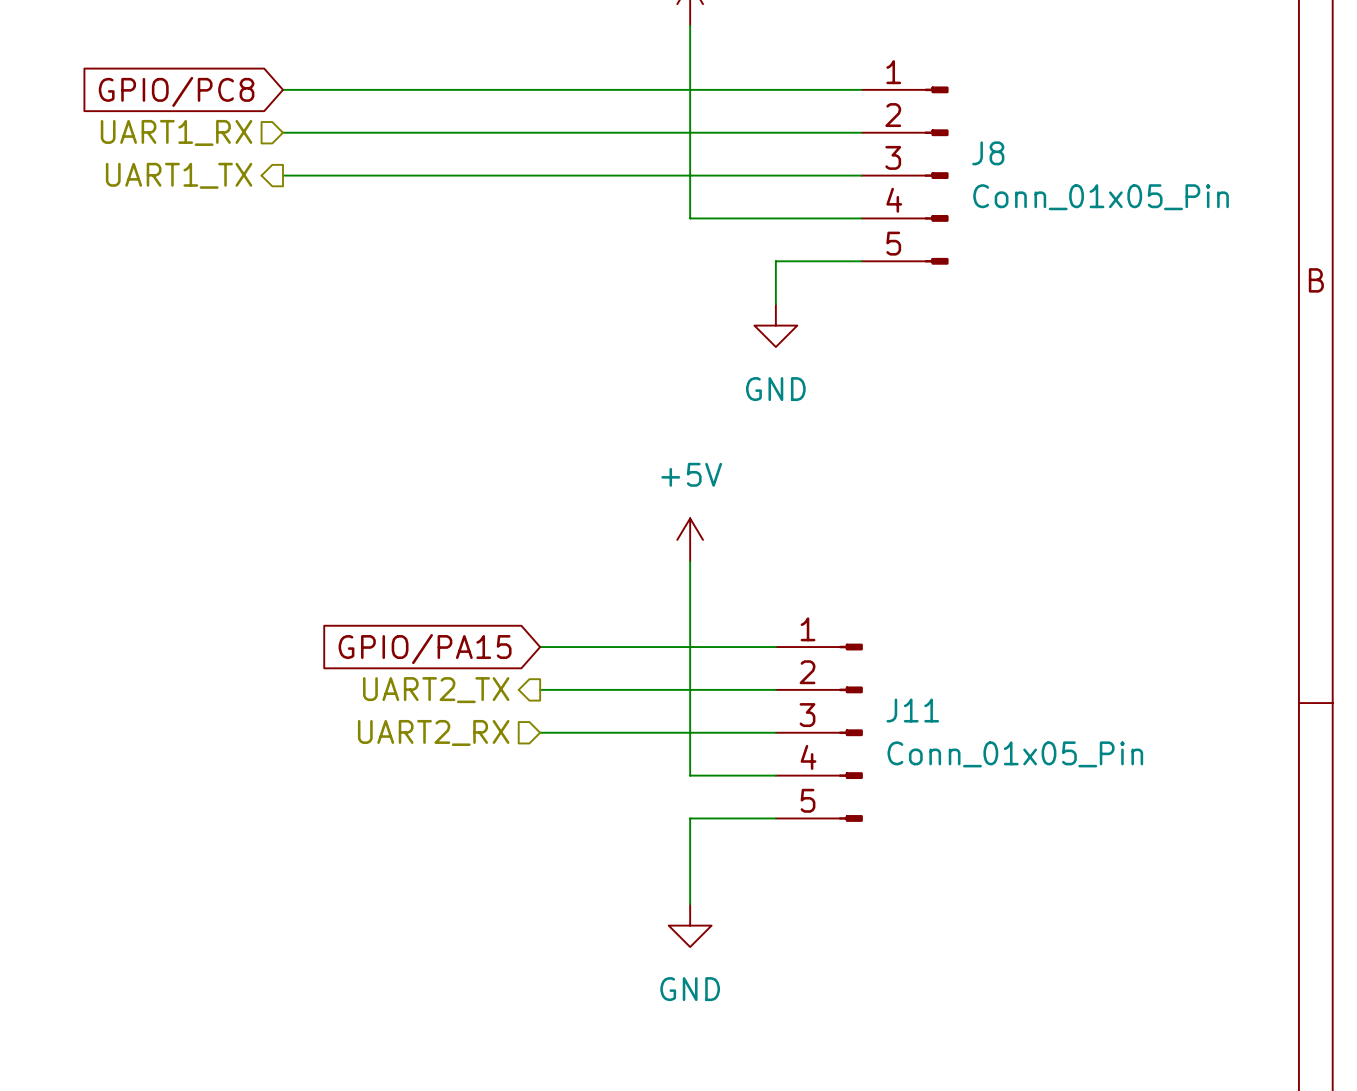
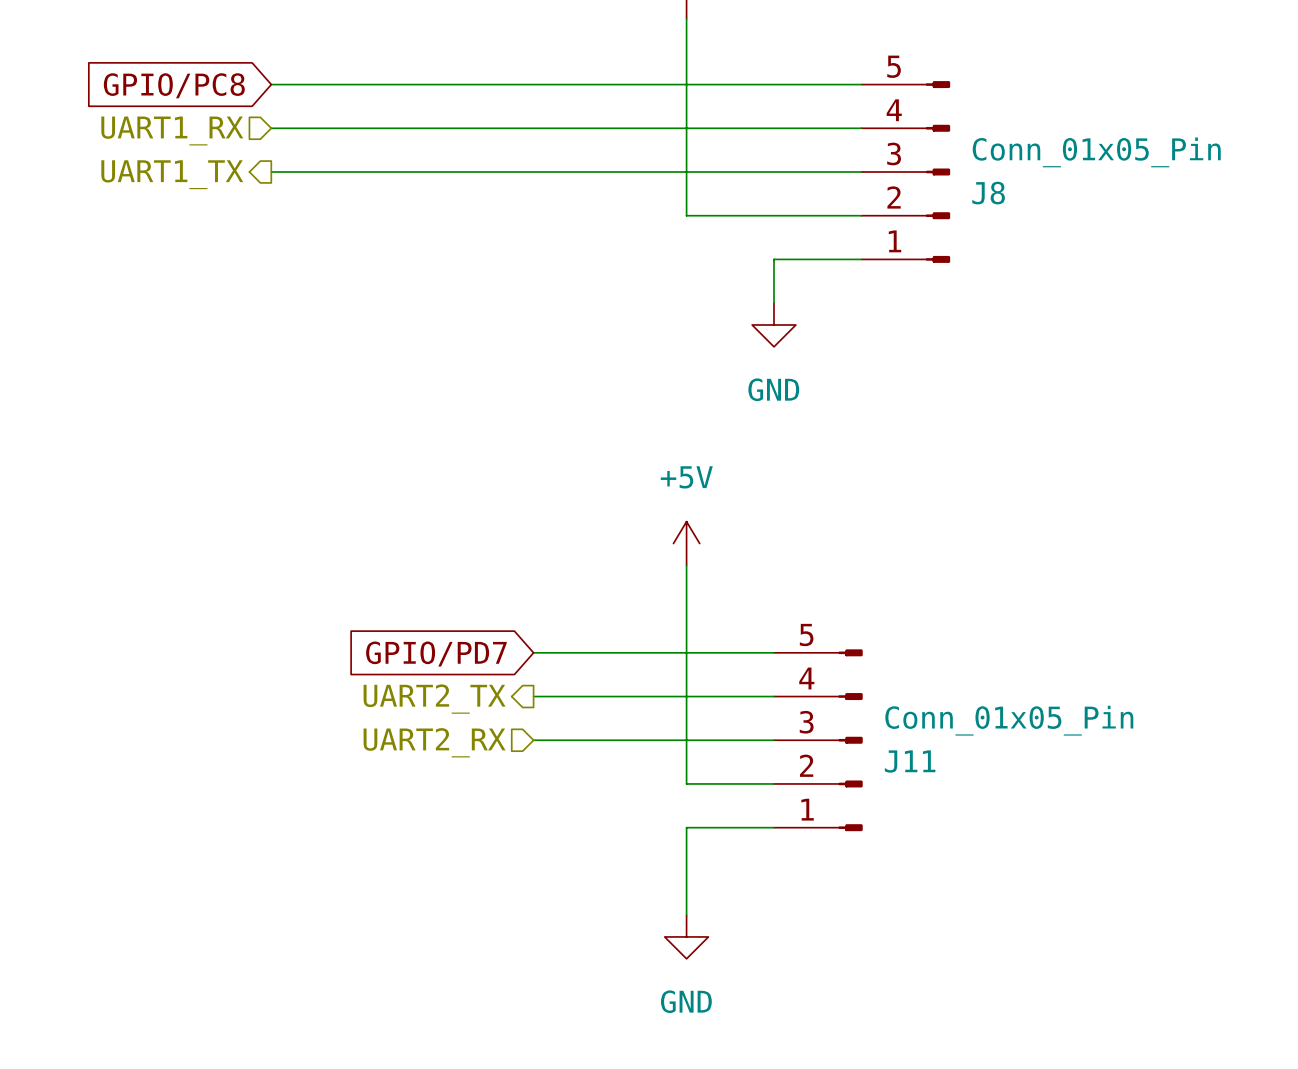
J8 flip: as is (936, 175) -> up-down (937, 171)
global label: GPIO/PA15 (425, 649) -> GPIO/PD7 (436, 654)
J11 flip: as is (850, 732) -> up-down (850, 740)

